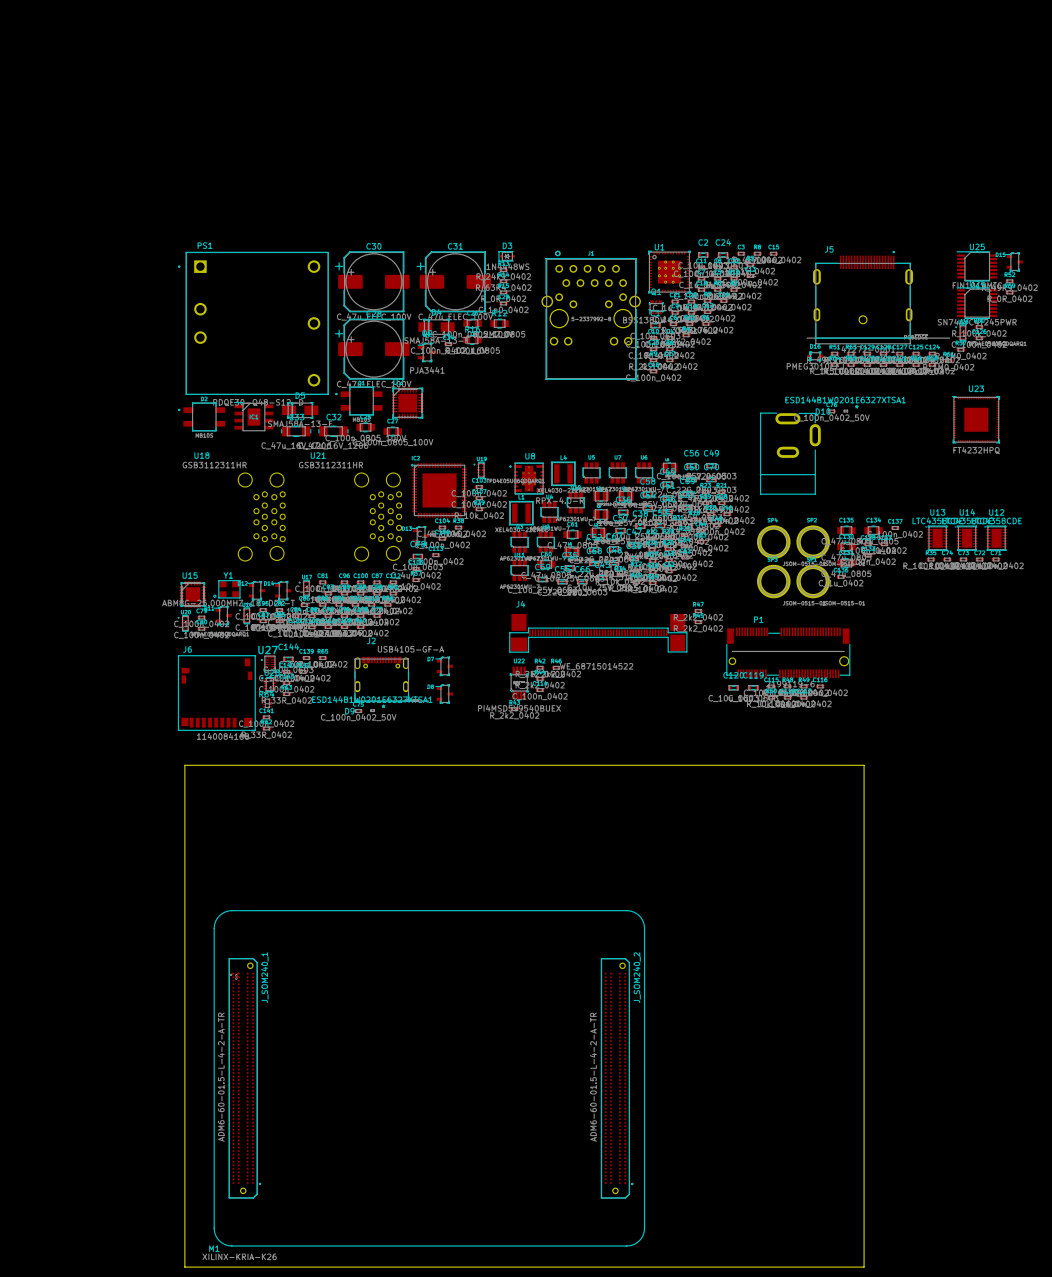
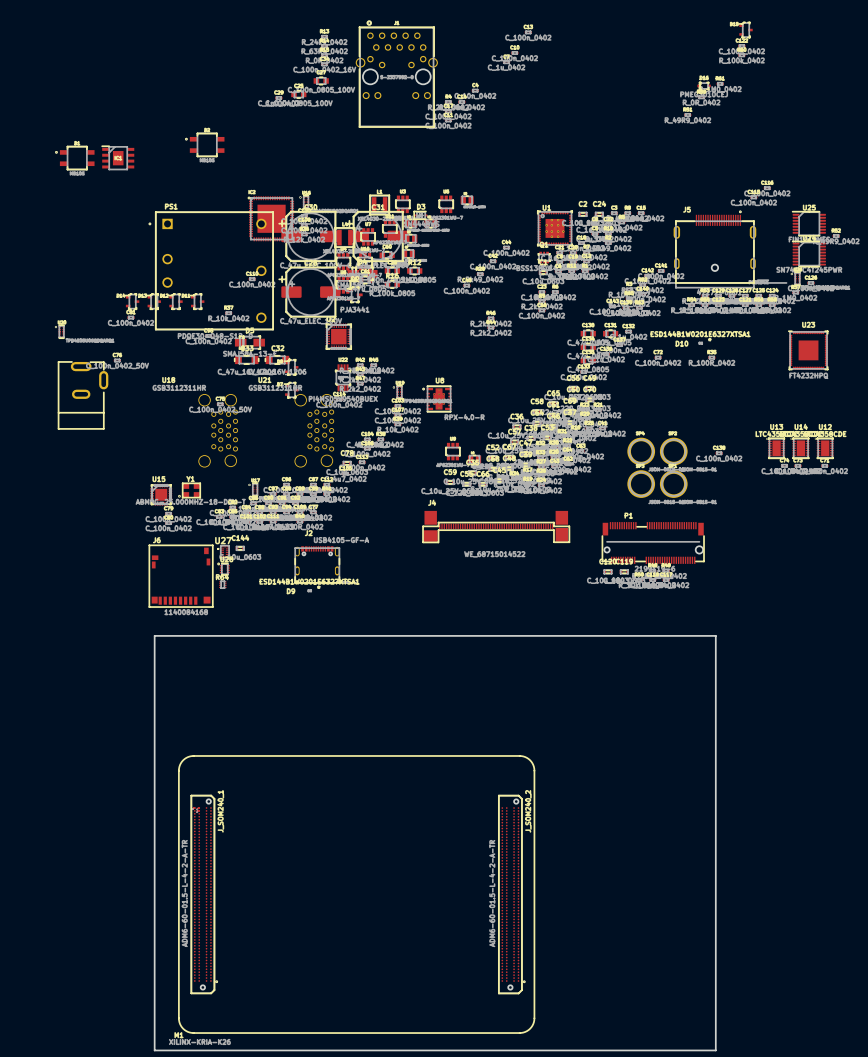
part position: (1014, 261) -> (745, 30)
part position: (701, 267) -> (448, 120)
part position: (503, 270) -> (324, 36)
part position: (750, 275) -> (528, 32)
part position: (701, 278) -> (506, 62)
part position: (503, 281) -> (324, 46)
part position: (717, 289) -> (629, 289)
part position: (503, 292) -> (324, 55)
part position: (1009, 292) -> (701, 97)
part position: (723, 300) -> (461, 102)
part position: (503, 303) -> (278, 98)
part position: (591, 315) -> (396, 74)
part position: (979, 327) -> (741, 55)
part position: (686, 335) -> (448, 102)
part position: (653, 338) -> (514, 52)
part position: (669, 338) -> (475, 90)
part position: (448, 344) -> (324, 64)
part position: (834, 353) -> (687, 115)
part position: (815, 356) -> (704, 85)
part position: (669, 360) -> (448, 111)
part position: (948, 360) -> (720, 83)
part position: (883, 364) -> (741, 46)
part position: (358, 401) -> (75, 158)
part position: (831, 411) -> (117, 360)
part position: (201, 416) -> (204, 144)
part position: (253, 416) -> (117, 157)
part position: (365, 427) -> (298, 94)
part position: (392, 431) -> (321, 80)
part: (790, 453) -> none
part position: (669, 467) -> (467, 200)
part position: (591, 472) -> (446, 204)
part position: (617, 472) -> (368, 236)
part position: (644, 472) -> (343, 284)
part position: (563, 473) -> (344, 237)
part: none -> (83, 395)
part position: (438, 490) -> (270, 218)
part position: (601, 496) -> (410, 223)
part position: (625, 496) -> (408, 253)
part position: (575, 502) -> (365, 261)
part position: (721, 503) -> (480, 274)
part position: (549, 512) -> (343, 261)
part position: (521, 513) -> (379, 205)
part position: (601, 514) -> (410, 238)
part position: (717, 525) -> (466, 285)
part position: (895, 527) -> (619, 345)
part position: (700, 530) -> (506, 247)
part position: (846, 530) -> (588, 360)
part position: (873, 530) -> (588, 347)
part position: (598, 532) -> (431, 223)
part position: (572, 534) -> (365, 279)
part position: (420, 535) -> (153, 301)
part position: (519, 542) -> (402, 204)
part position: (884, 544) -> (628, 331)
part position: (846, 546) -> (588, 333)
part position: (868, 555) -> (583, 371)
part position: (931, 559) -> (711, 357)
part position: (979, 559) -> (658, 357)
part position: (846, 563) -> (610, 333)
part position: (546, 564) -> (387, 255)
part position: (519, 570) -> (389, 229)
part position: (669, 571) -> (493, 261)
part position: (841, 576) -> (606, 354)
part position: (416, 580) -> (228, 313)
part position: (322, 582) -> (130, 317)
part position: (360, 582) -> (304, 215)
part position: (256, 590) -> (175, 301)
part position: (282, 590) -> (132, 301)
part position: (371, 604) -> (252, 279)
part position: (387, 604) -> (304, 234)
part position: (263, 610) -> (208, 336)
part position: (698, 611) -> (360, 383)
part position: (222, 615) -> (197, 301)
part position: (245, 615) -> (304, 202)
part position: (698, 622) -> (373, 365)
part position: (183, 623) -> (60, 331)
part position: (344, 626) -> (304, 225)
part position: (306, 658) -> (626, 307)
part position: (322, 658) -> (629, 298)
part position: (444, 666) -> (291, 390)
part position: (540, 667) -> (360, 365)
part position: (556, 667) -> (491, 318)
part position: (286, 671) -> (642, 294)
part position: (302, 671) -> (647, 275)
part position: (540, 678) -> (491, 327)
part position: (286, 682) -> (612, 306)
part position: (519, 682) -> (343, 377)
part position: (771, 686) -> (753, 197)
part position: (820, 686) -> (767, 188)
part position: (540, 690) -> (339, 399)
part position: (444, 693) -> (291, 367)
part position: (286, 694) -> (639, 307)
part position: (514, 709) -> (360, 374)
part position: (358, 711) -> (220, 404)
part position: (266, 717) -> (661, 270)
part position: (266, 728) -> (642, 285)

